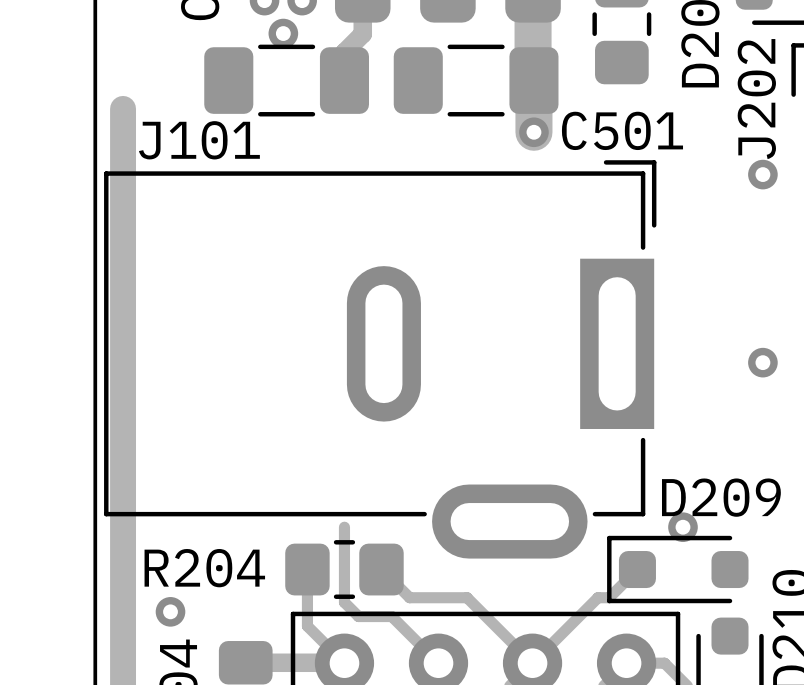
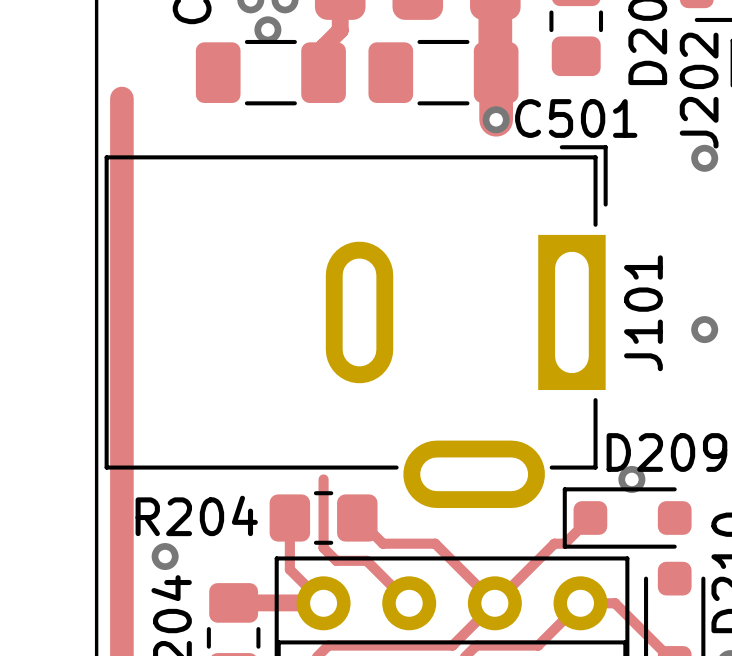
J101 name rotation: 0° (199, 140) -> 90° counterclockwise (643, 313)
J101 name position: J101 (199, 140) -> J101 (643, 313)

